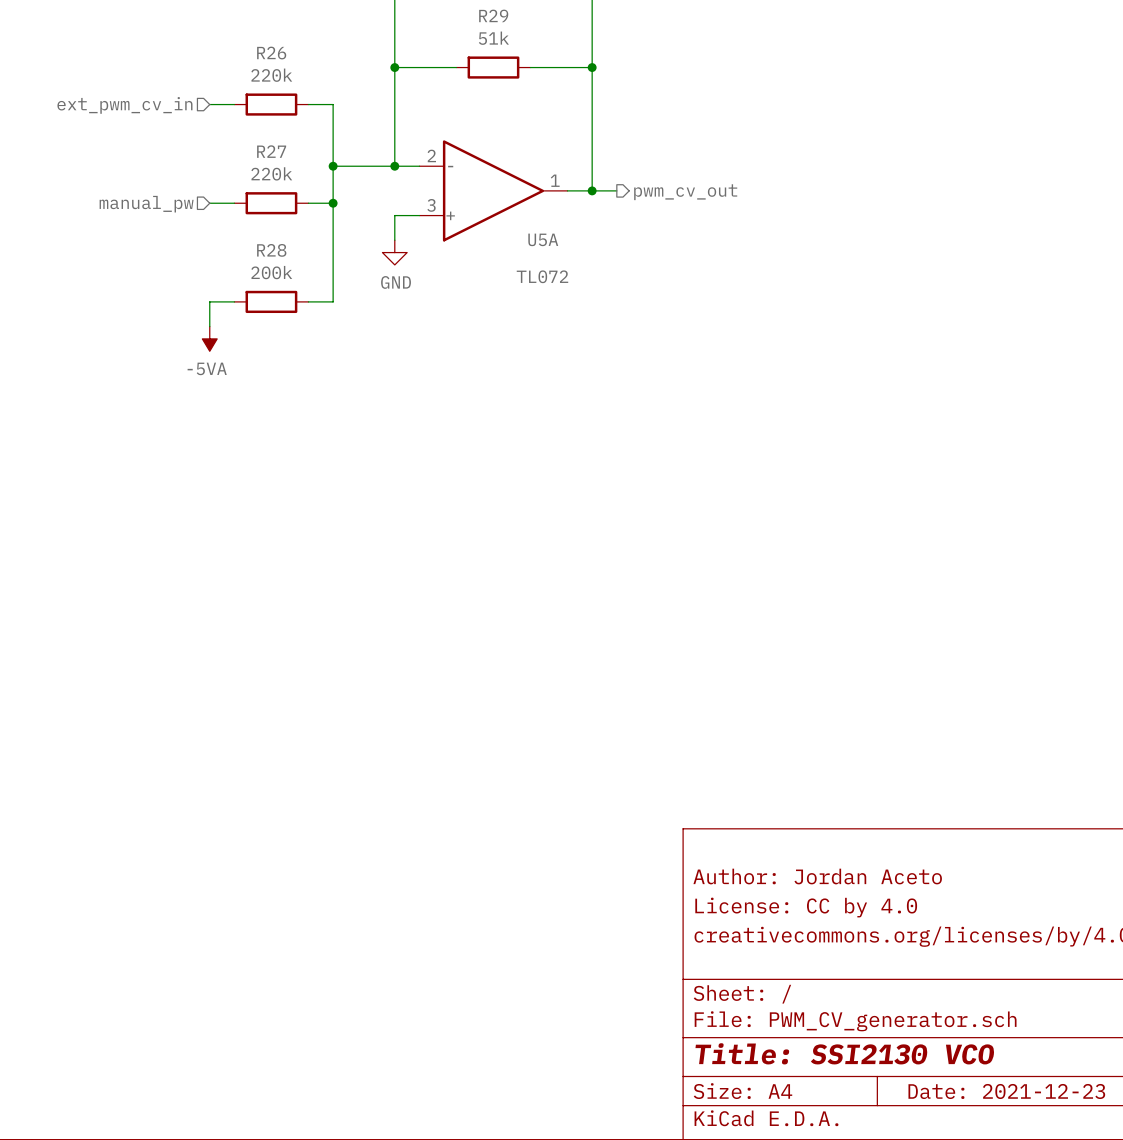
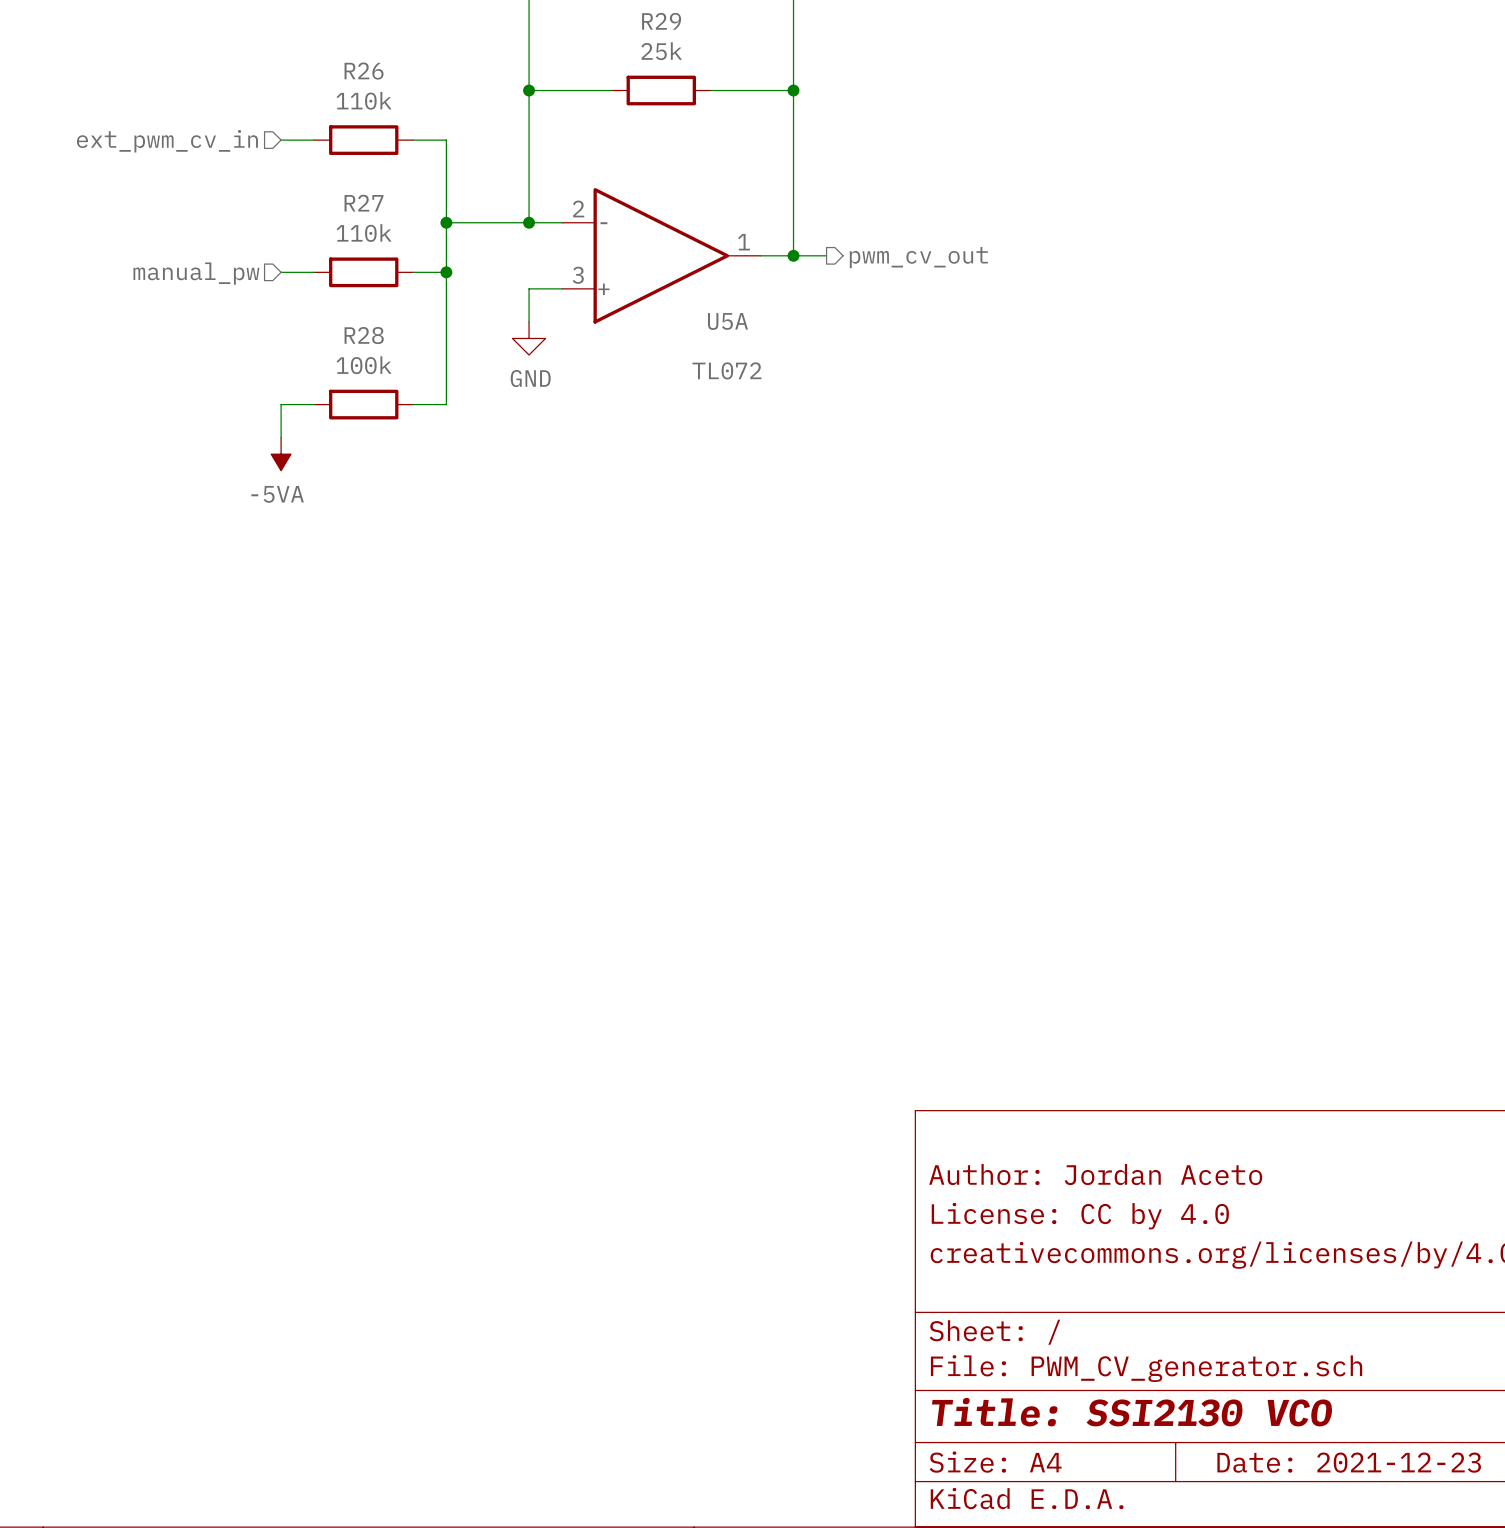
R29 value: 51k (493, 38) -> 25k (661, 51)
R26 value: 220k (271, 75) -> 110k (364, 100)
R27 value: 220k (271, 173) -> 110k (364, 233)
R28 value: 200k (271, 272) -> 100k (364, 365)

